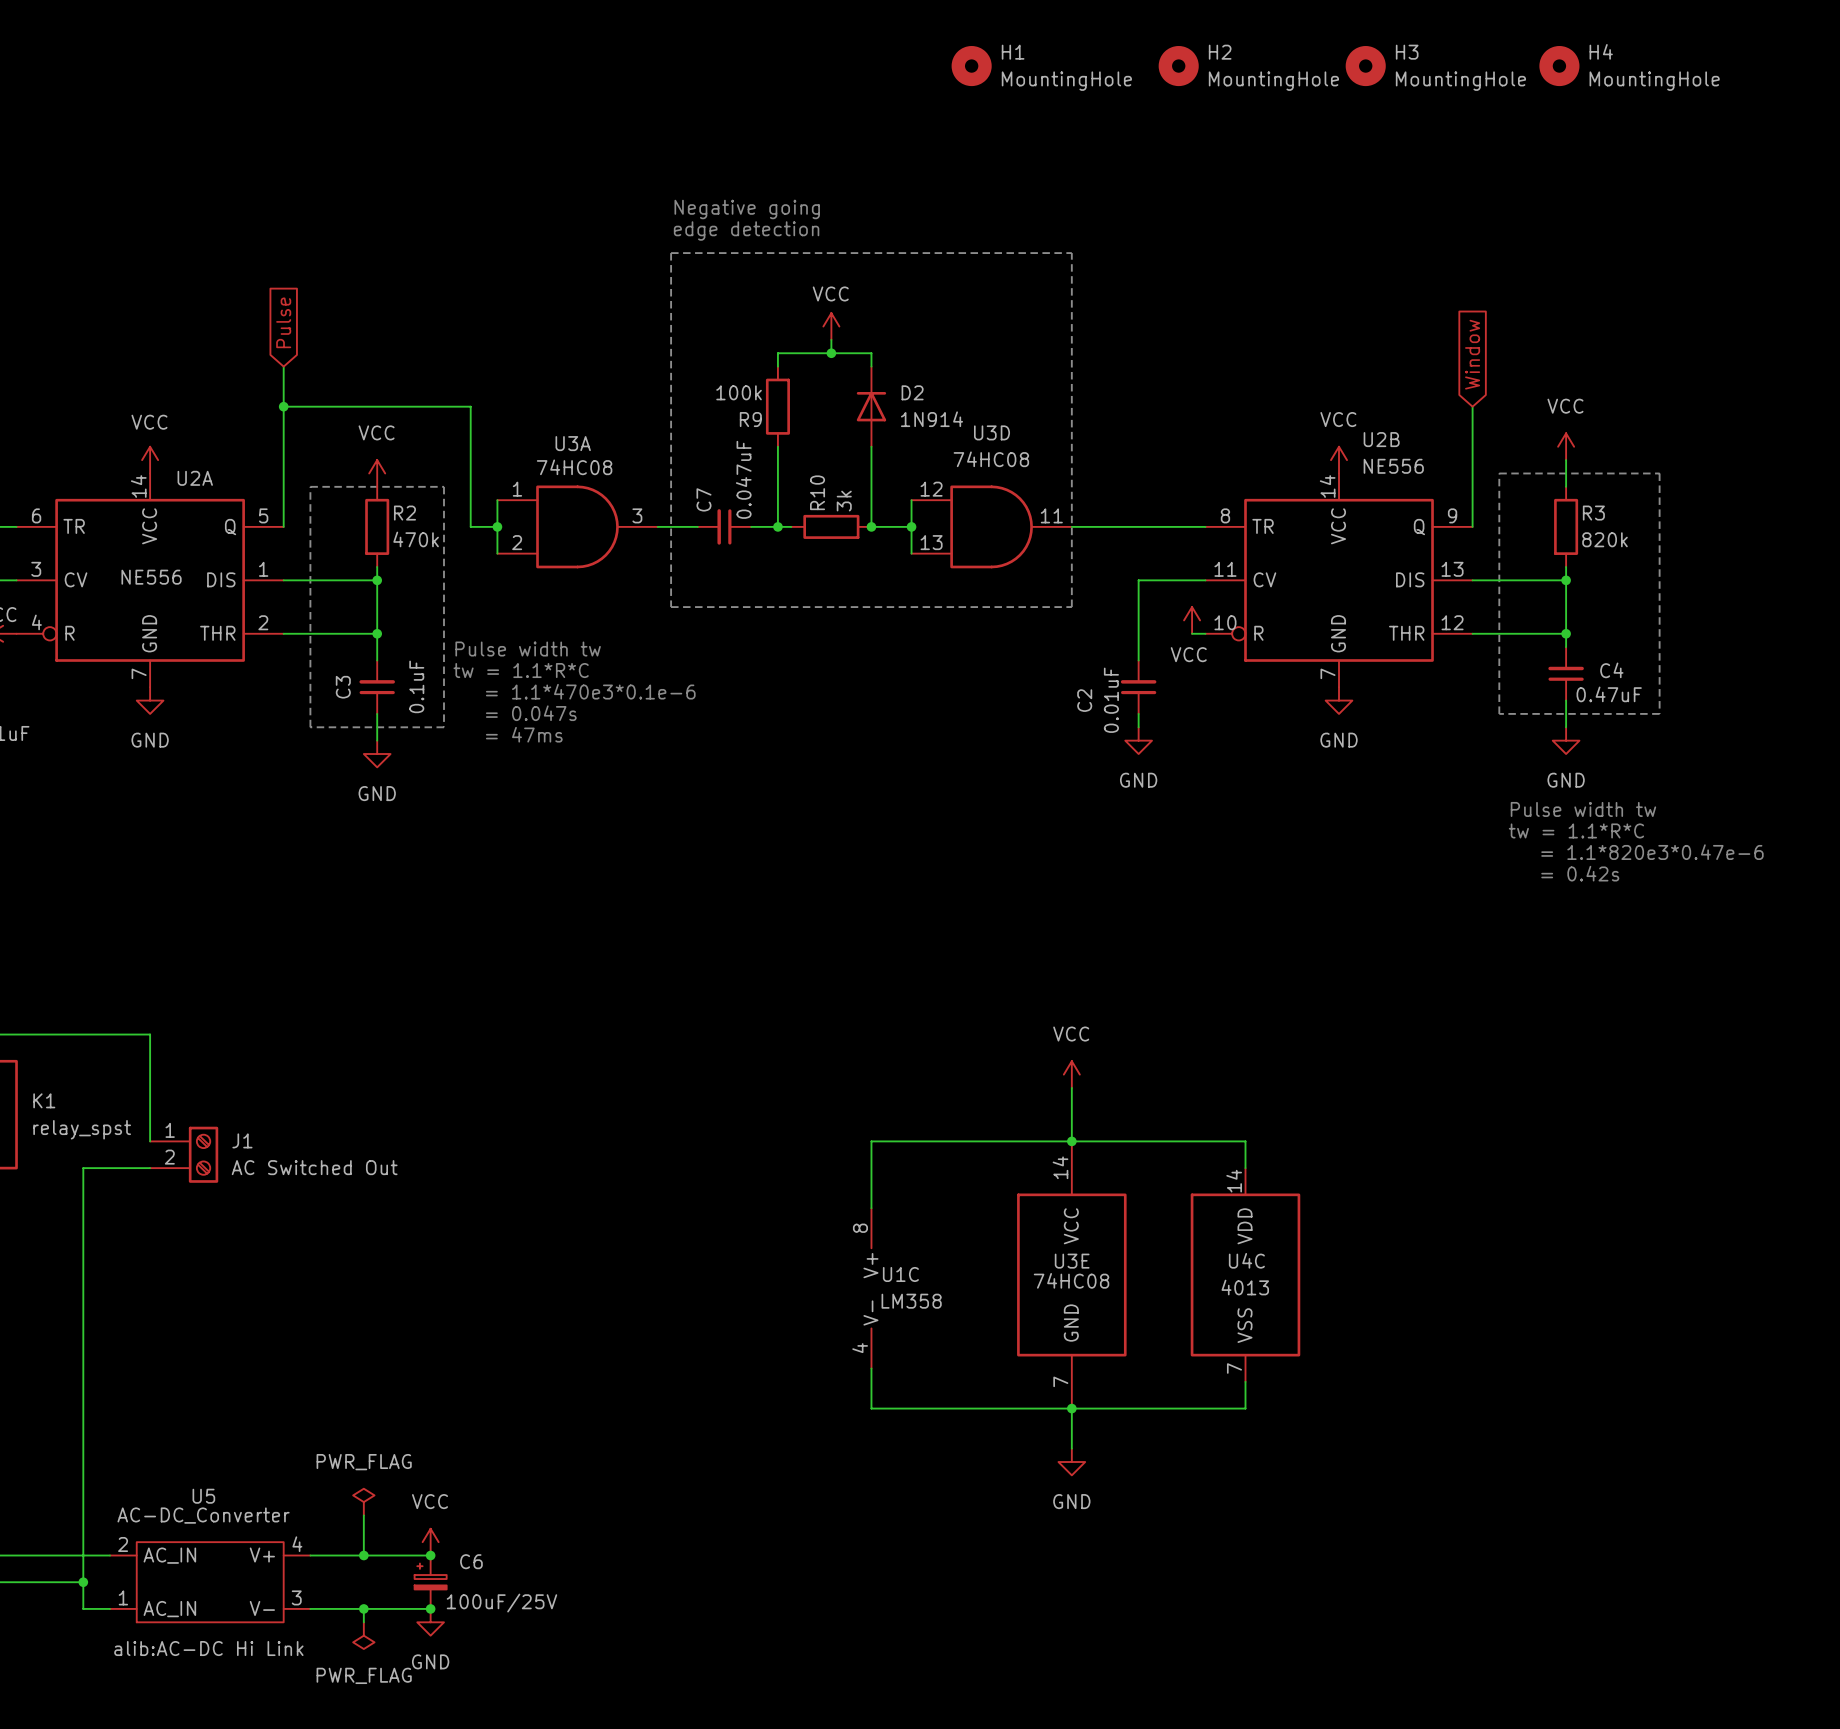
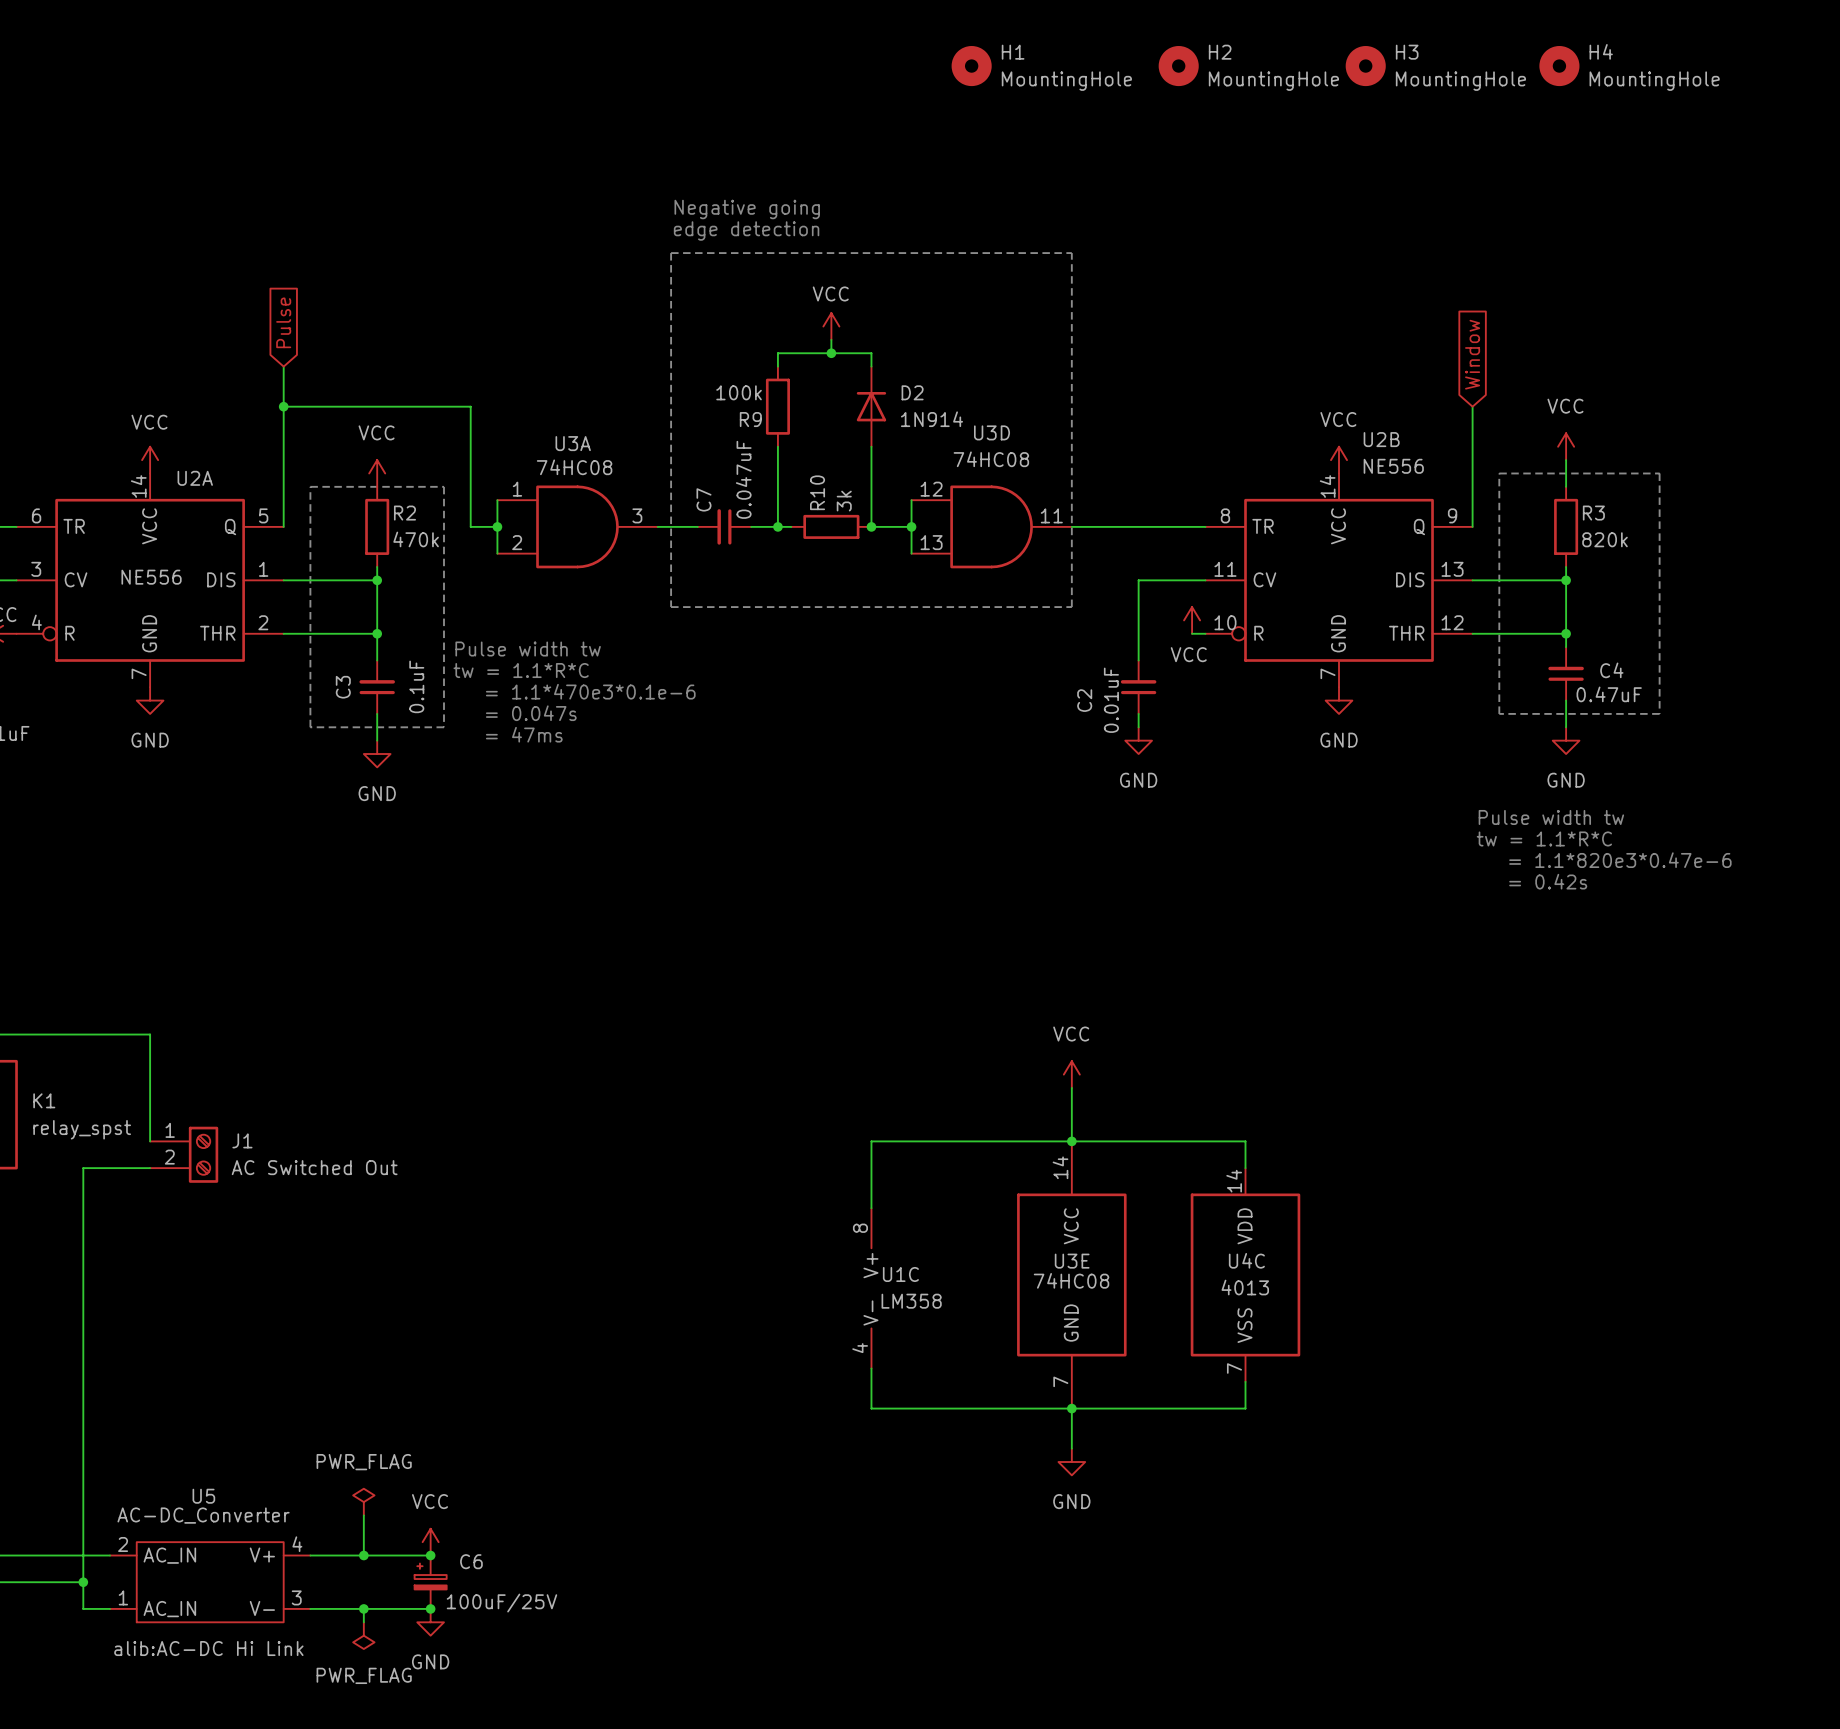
text position: Pulse width tw (1583, 809) -> Pulse width tw (1551, 817)
text position: tw = 1.1*R*C (1576, 830) -> tw = 1.1*R*C (1544, 838)
text position: = 1.1*820e3*0.47e-6 (1652, 852) -> = 1.1*820e3*0.47e-6 (1620, 860)
text position: = 0.42s (1580, 873) -> = 0.42s (1548, 881)

